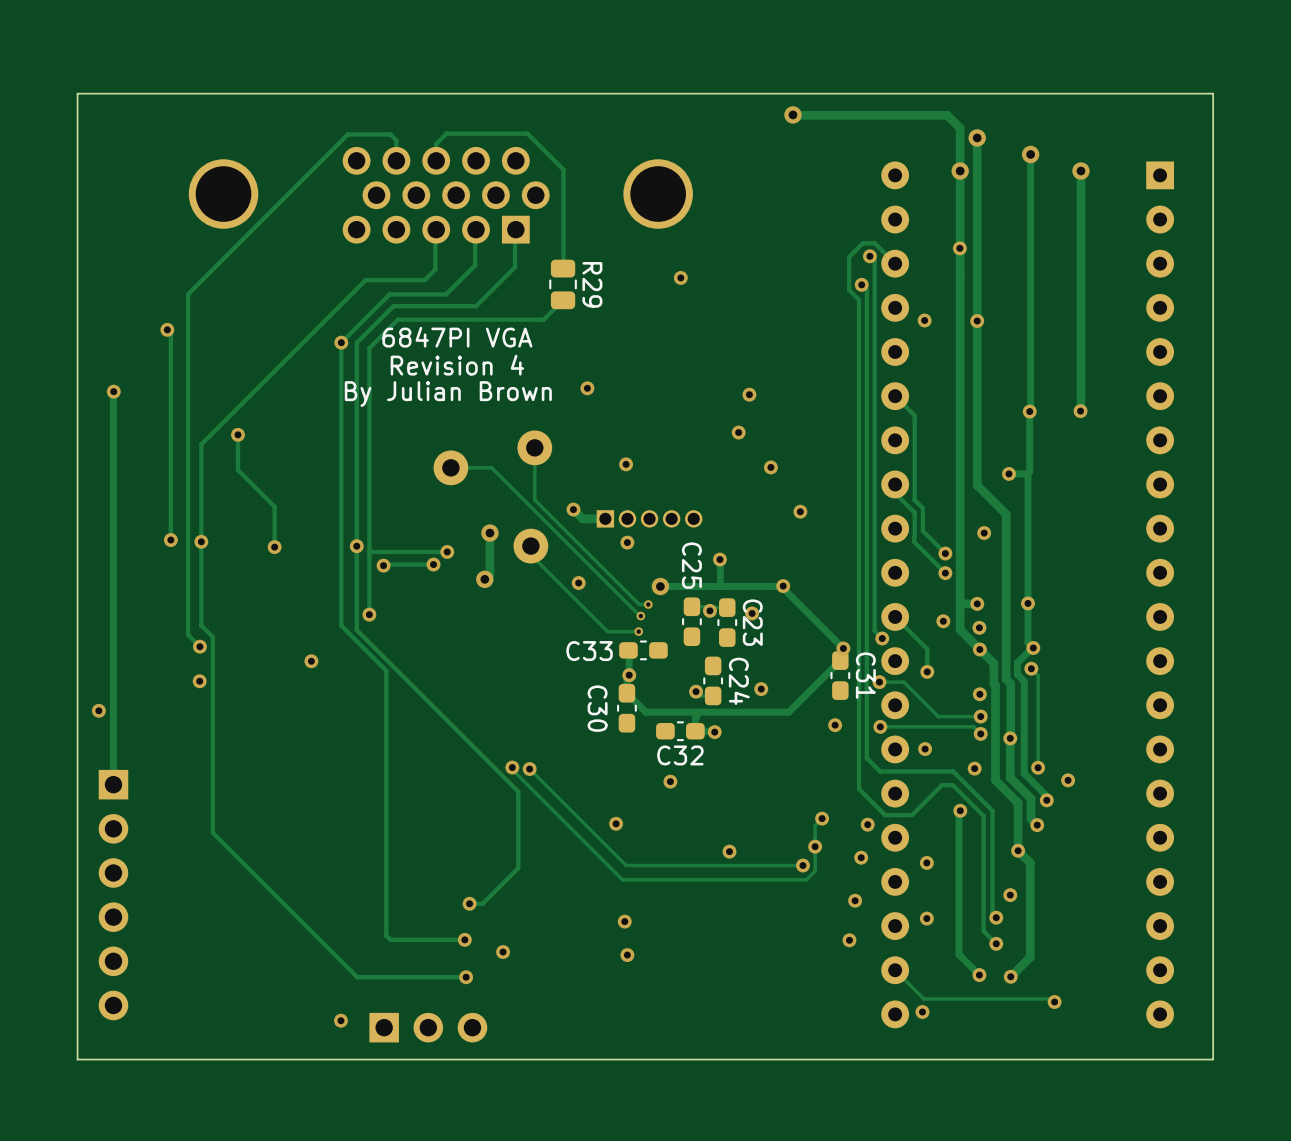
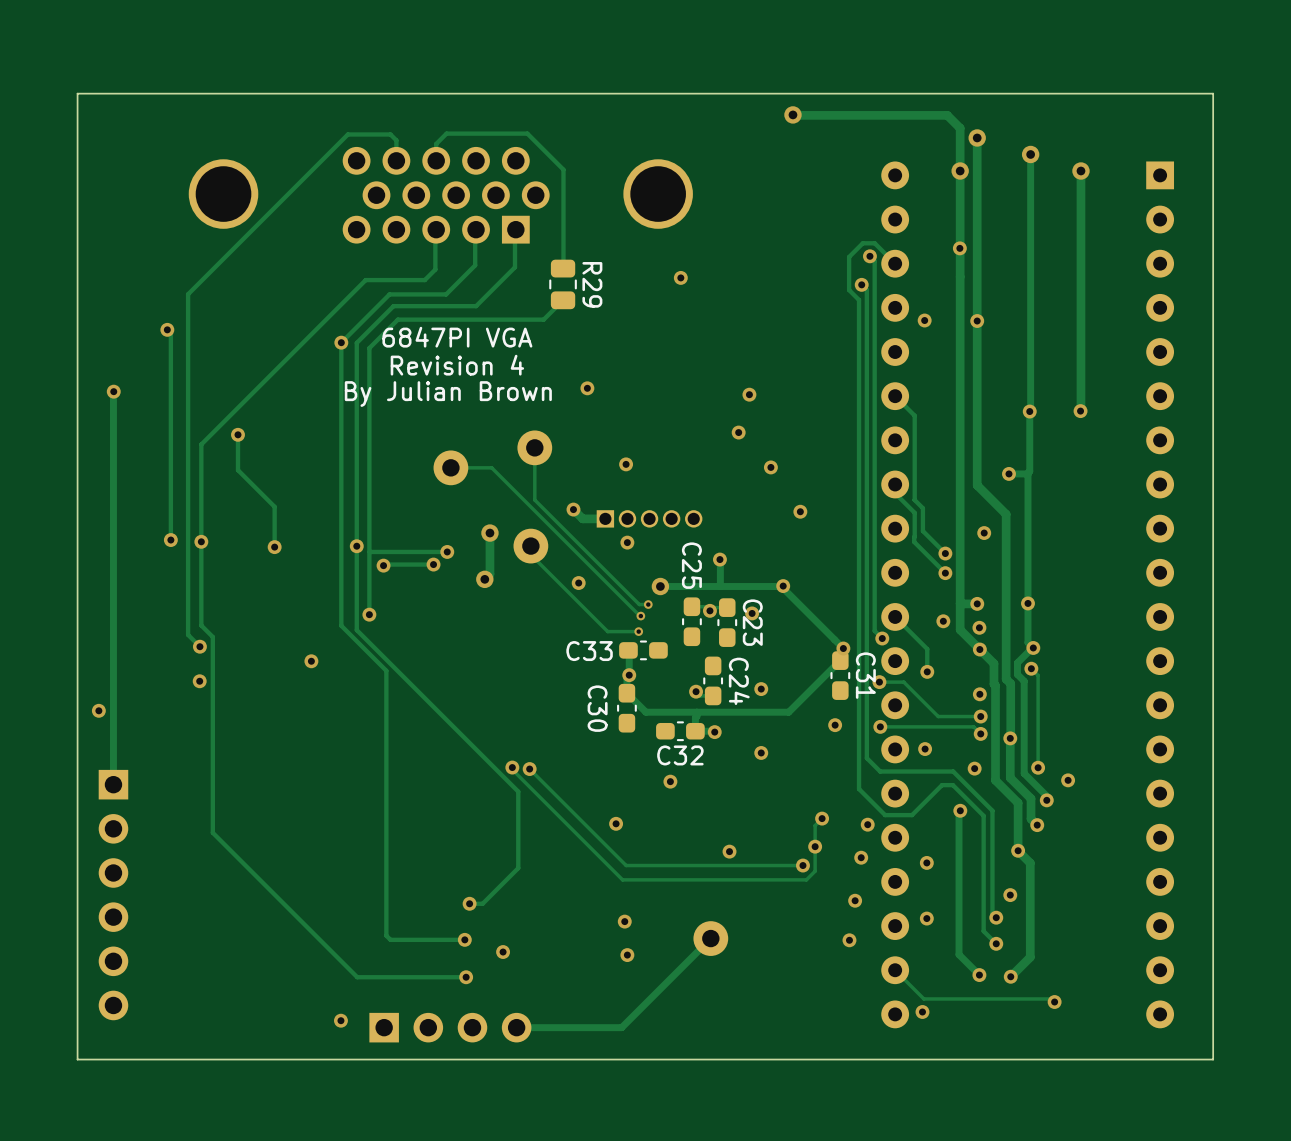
via: none -> (761, 752)
track: none -> (710, 938) (621, 1027) (516, 1027)
part: none -> (710, 938)
part: none -> (450, 1027)

